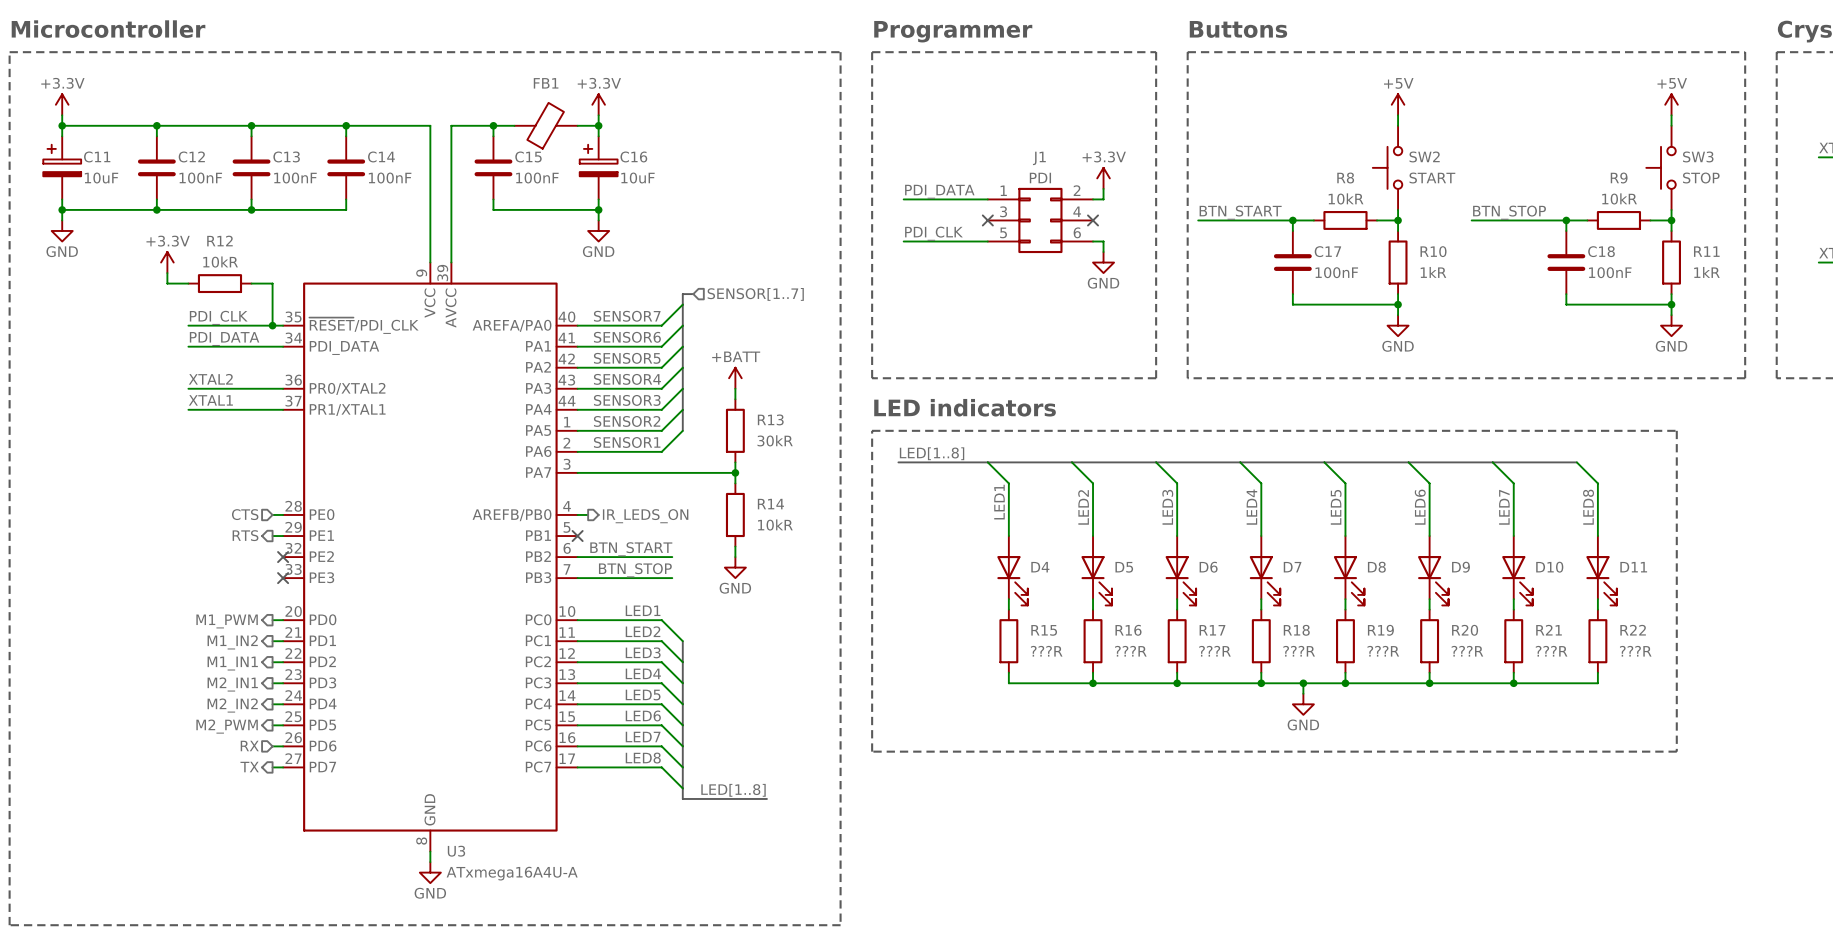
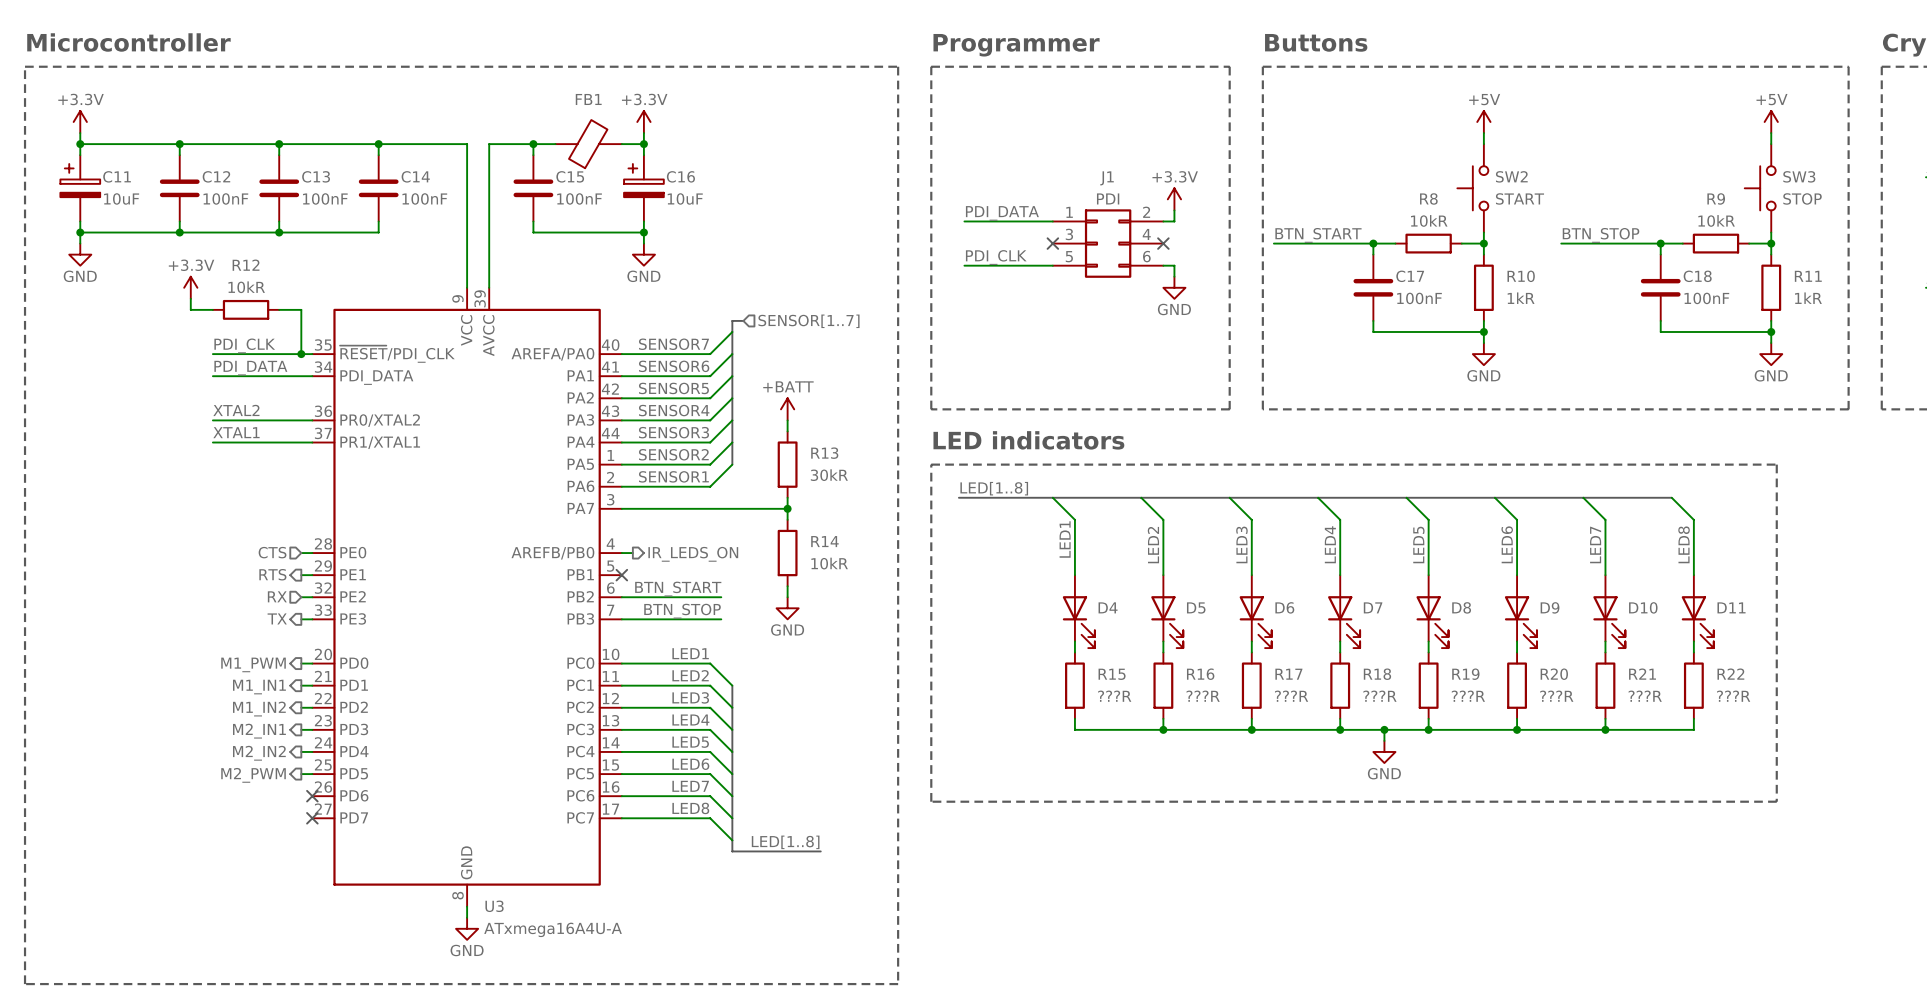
wire: none -> (301, 597) (312, 597)
no-connect mark: (283, 557) -> none
no-connect mark: (283, 578) -> none
hierarchical label: M1_IN2 (232, 642) -> M1_IN1 (259, 687)
hierarchical label: M1_IN1 (232, 663) -> M1_IN2 (259, 709)
hierarchical label position: RX (249, 745) -> RX (277, 596)
wire: (272, 746) (283, 746) -> (301, 619) (312, 619)
no-connect mark: none -> (312, 796)
hierarchical label position: TX (249, 767) -> TX (277, 618)
wire: (272, 767) (283, 767) -> none
no-connect mark: none -> (312, 818)

